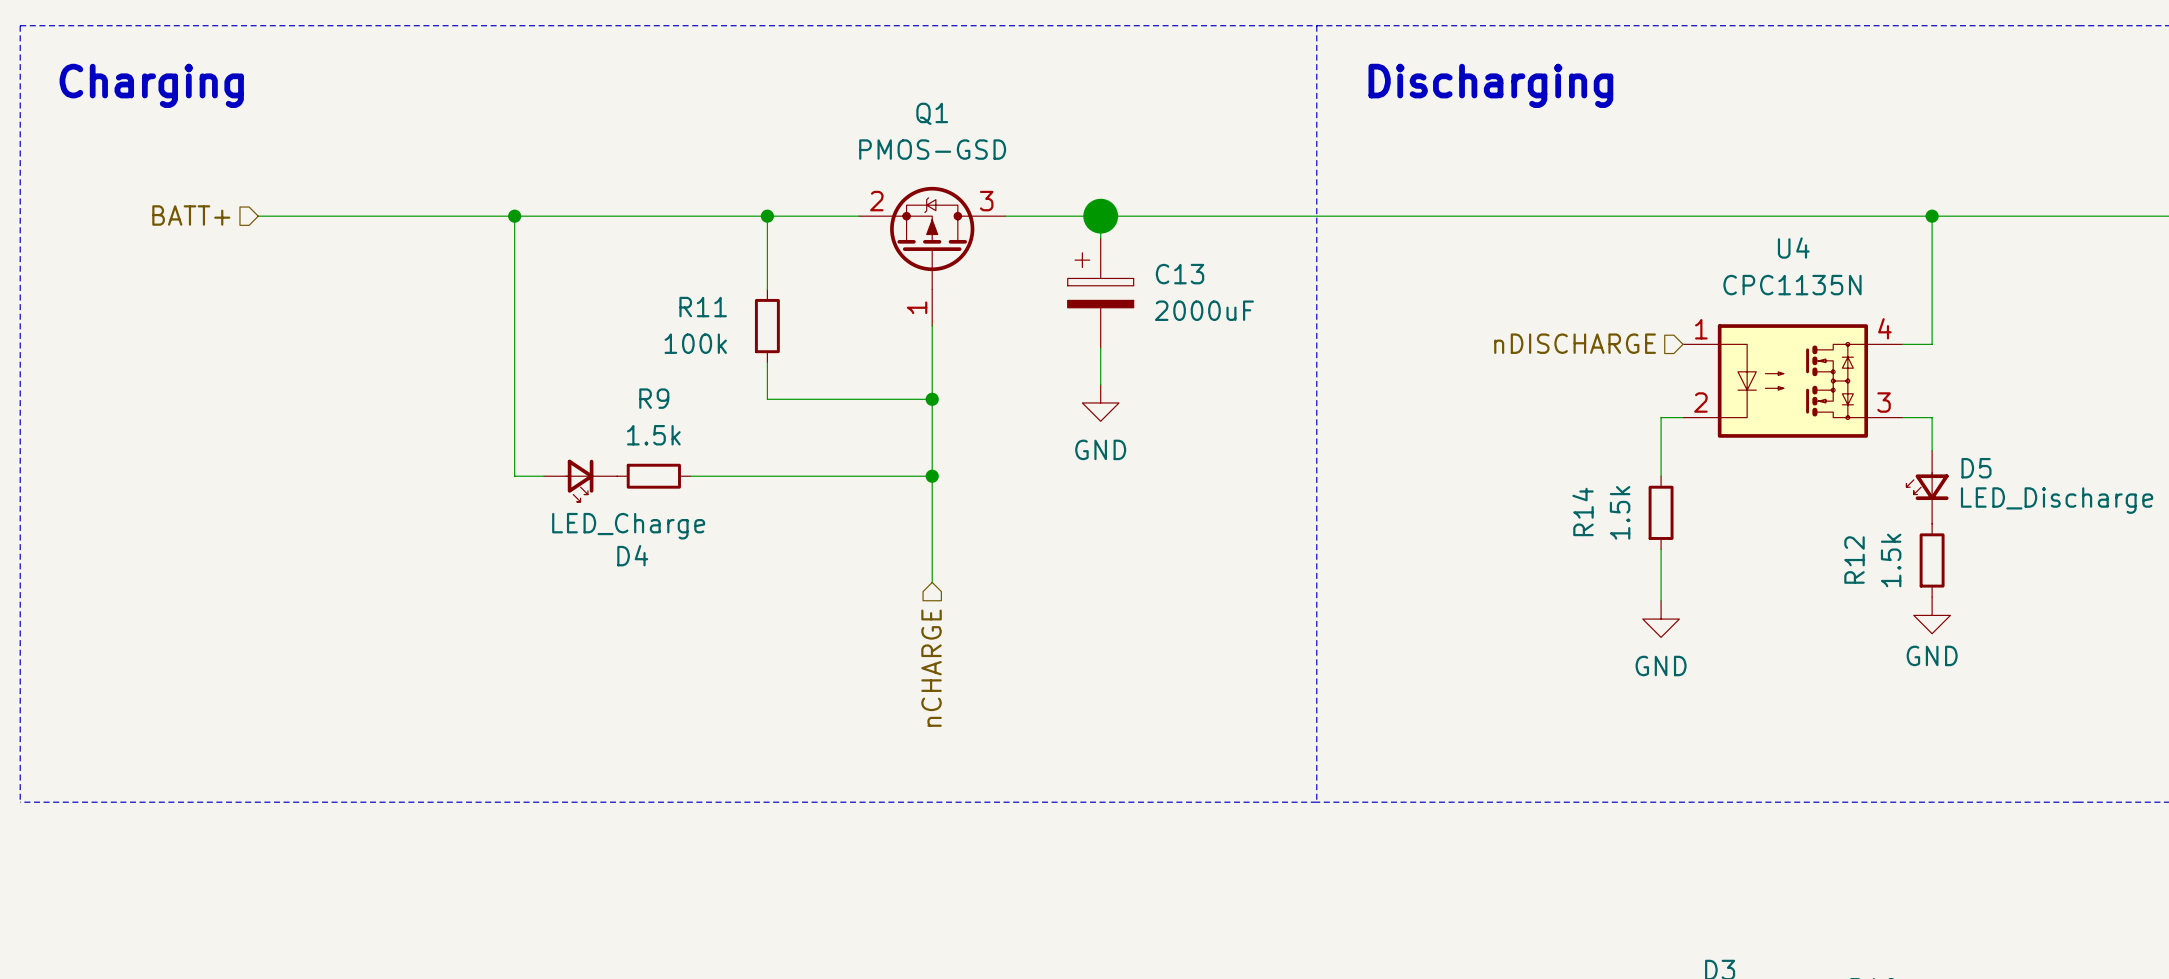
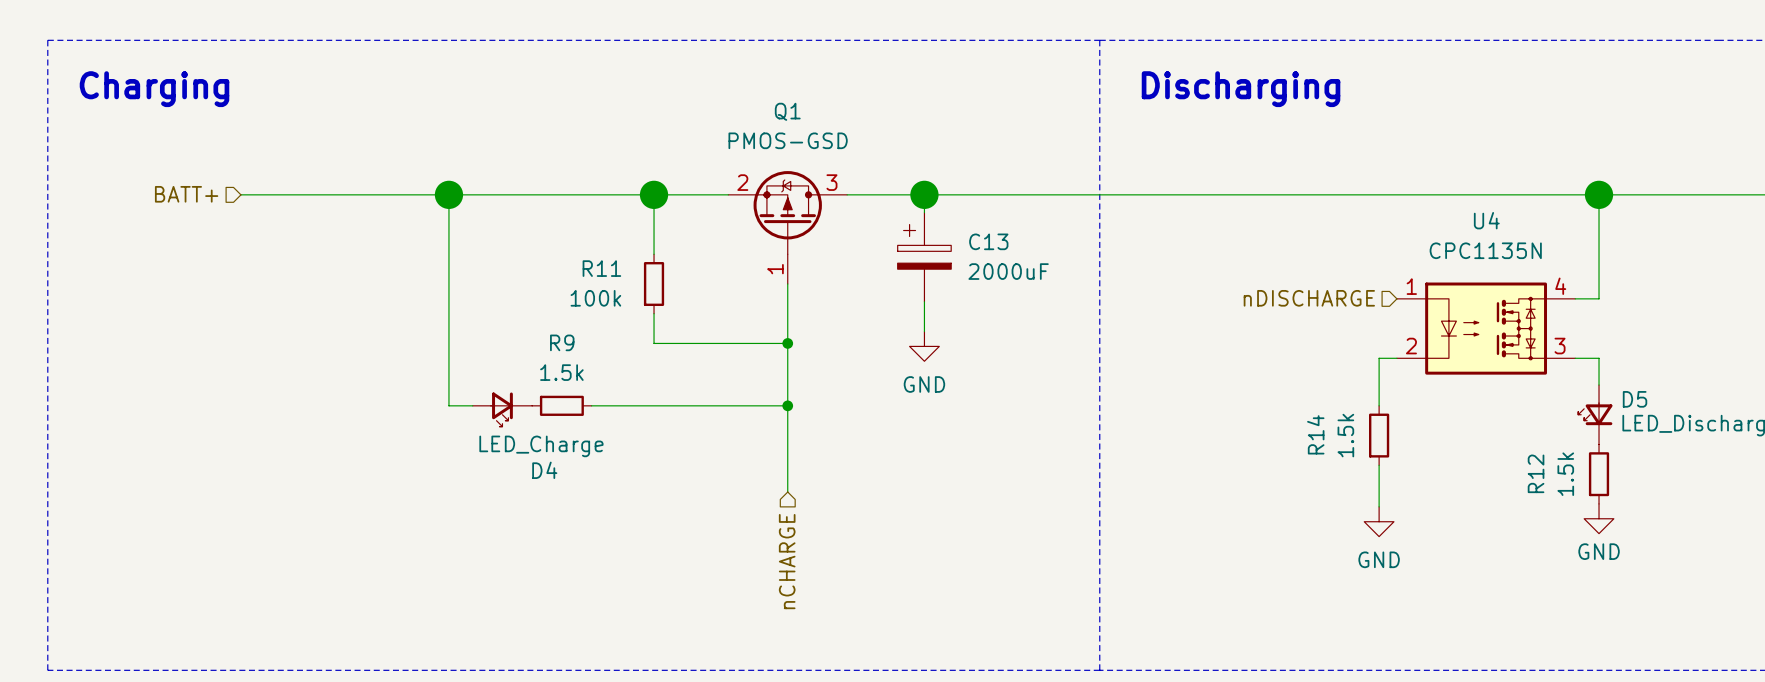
junction size: [508, 209, 522, 223] -> [434, 180, 464, 209]
junction size: [760, 209, 774, 223] -> [639, 180, 669, 209]
junction size: [1925, 209, 1939, 223] -> [1584, 180, 1614, 209]

